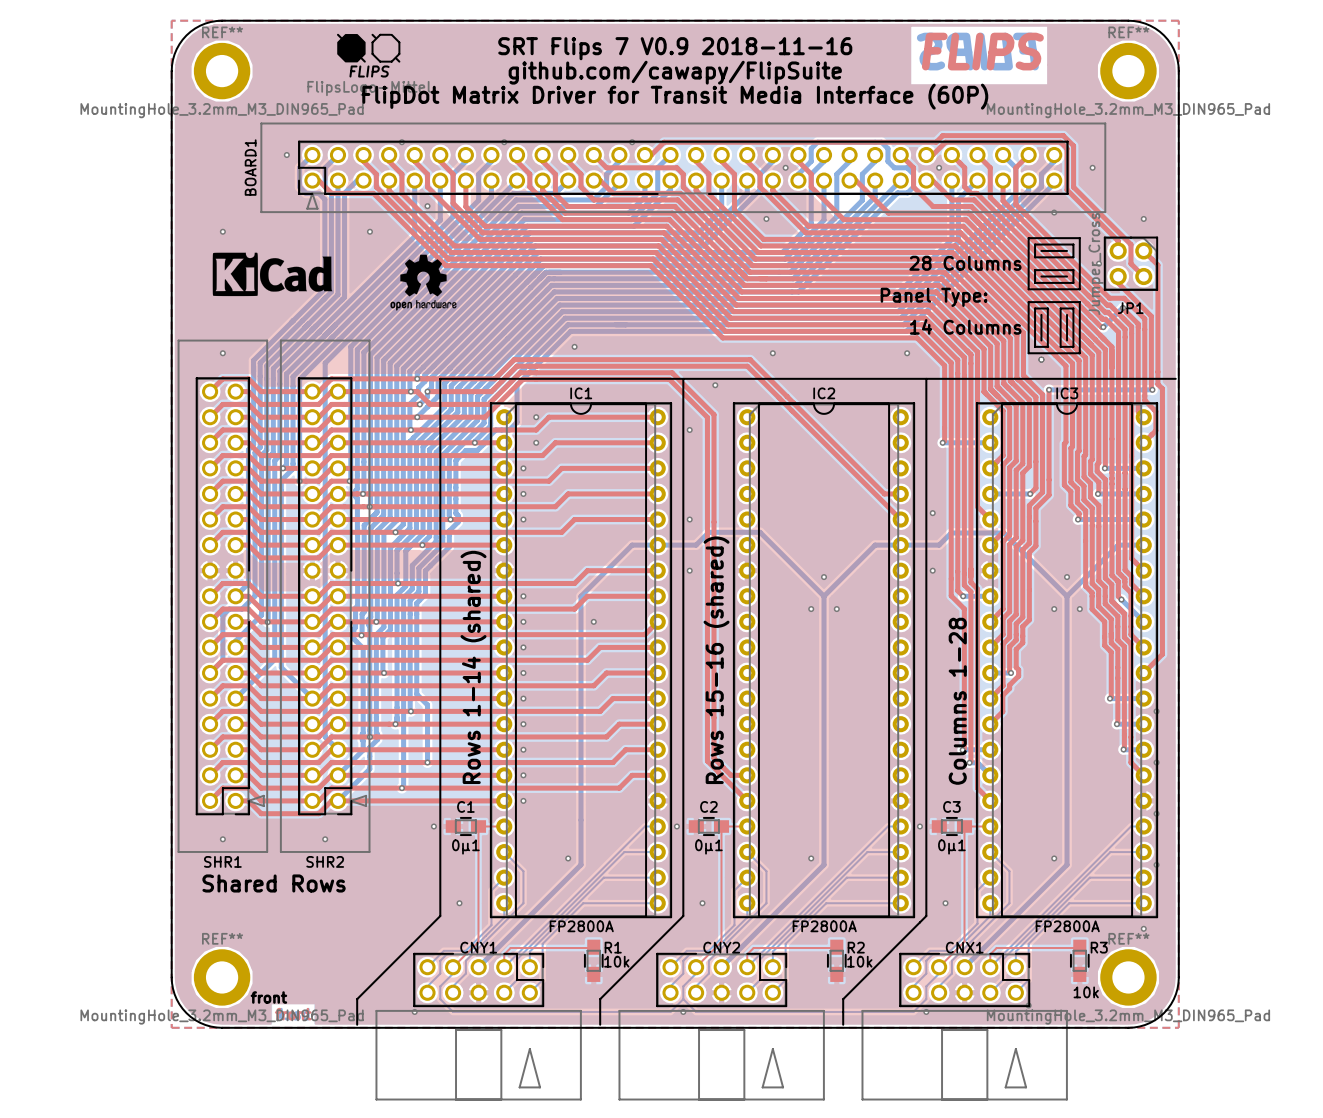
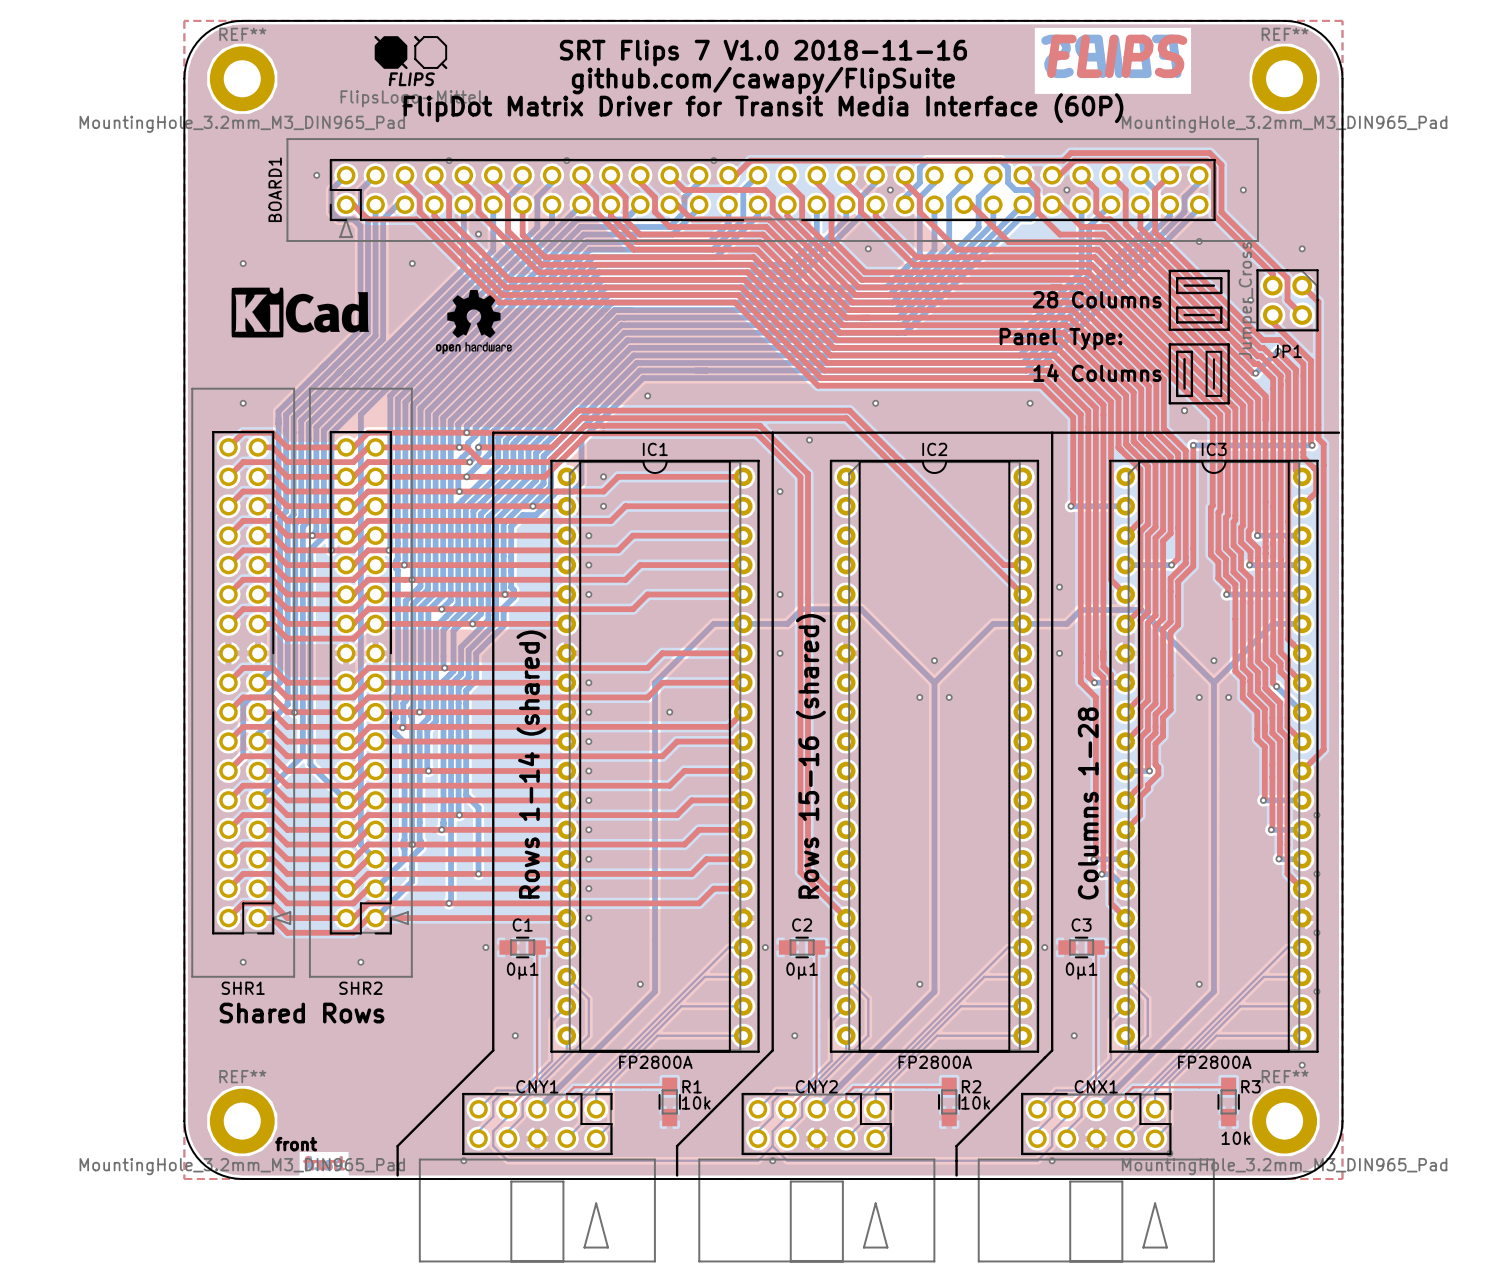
text: SRT Flips 7 V0.9 2018-11-16 (675, 48) -> SRT Flips 7 V1.0 2018-11-16 (763, 53)

